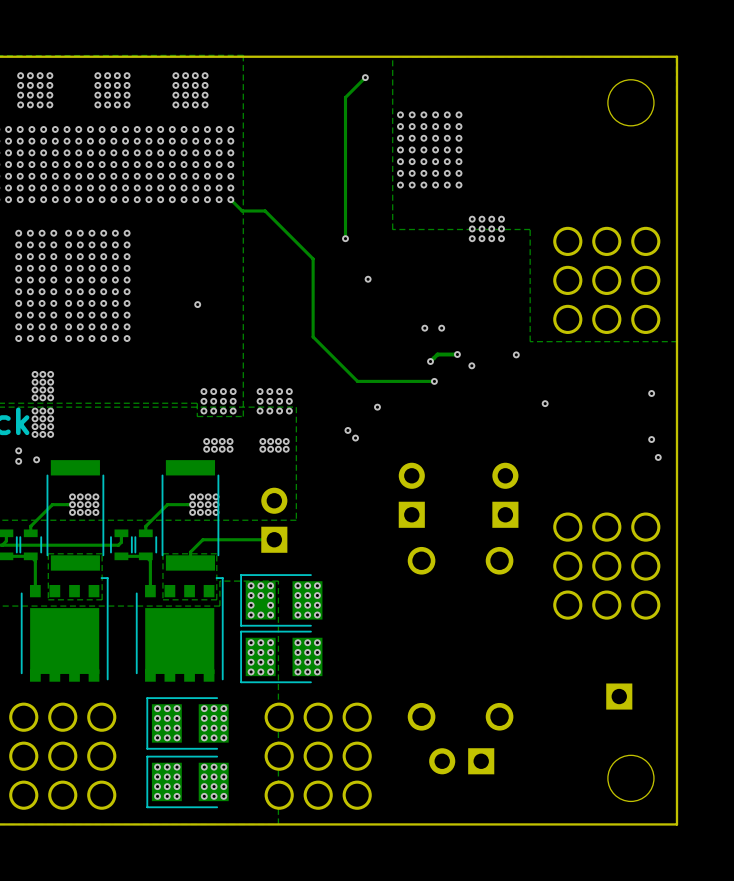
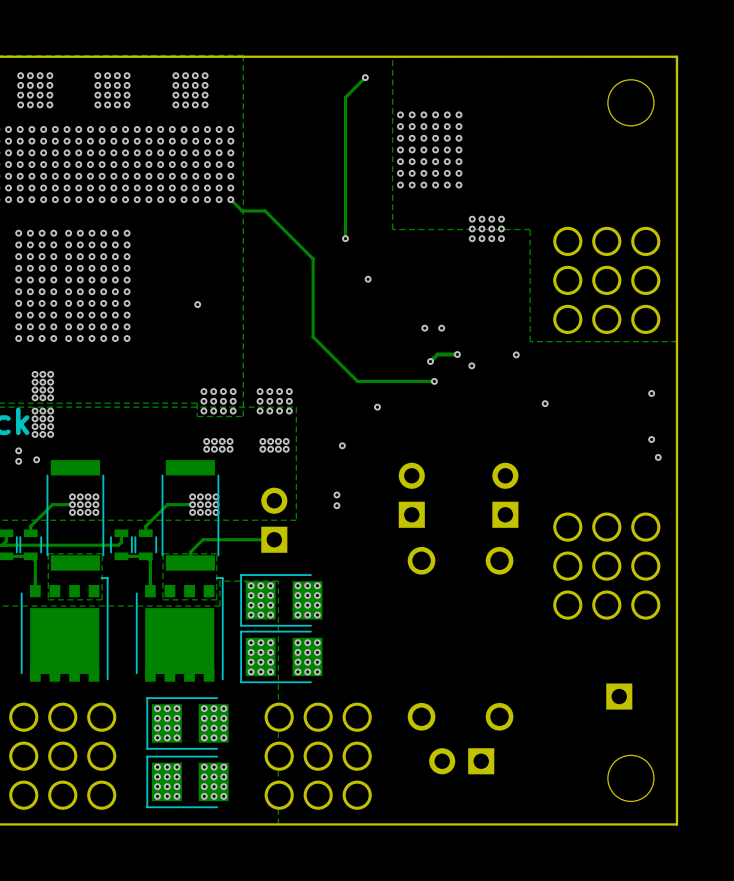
via: (347, 430) -> none
via: (355, 438) -> none
via: none -> (342, 445)
via: none -> (336, 494)
via: none -> (336, 505)
via: none -> (260, 605)

